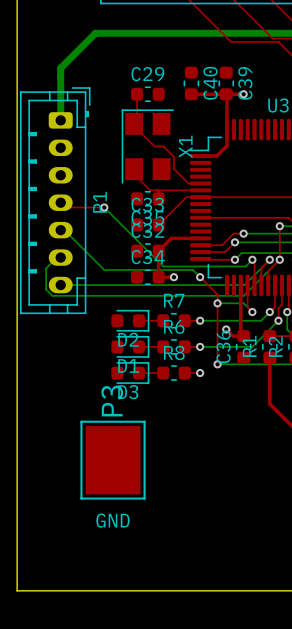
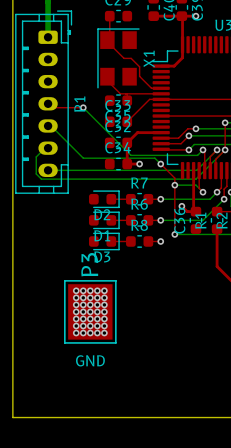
via: none -> (76, 290)
via: none -> (83, 290)
via: none -> (90, 290)
via: none -> (97, 290)
via: none -> (104, 290)
via: none -> (76, 297)
via: none -> (83, 297)
via: none -> (90, 297)
via: none -> (97, 297)
via: none -> (104, 297)
via: none -> (76, 304)
via: none -> (83, 304)
via: none -> (90, 304)
via: none -> (97, 304)
via: none -> (104, 304)
via: none -> (76, 311)
via: none -> (83, 311)
via: none -> (90, 311)
via: none -> (97, 311)
via: none -> (104, 311)
via: none -> (76, 318)
via: none -> (83, 318)
via: none -> (90, 318)
via: none -> (97, 318)
via: none -> (104, 318)
via: none -> (76, 325)
via: none -> (83, 325)
via: none -> (90, 325)
via: none -> (97, 325)
via: none -> (104, 325)
via: none -> (76, 333)
via: none -> (83, 333)
via: none -> (90, 333)
via: none -> (97, 333)
via: none -> (104, 333)

